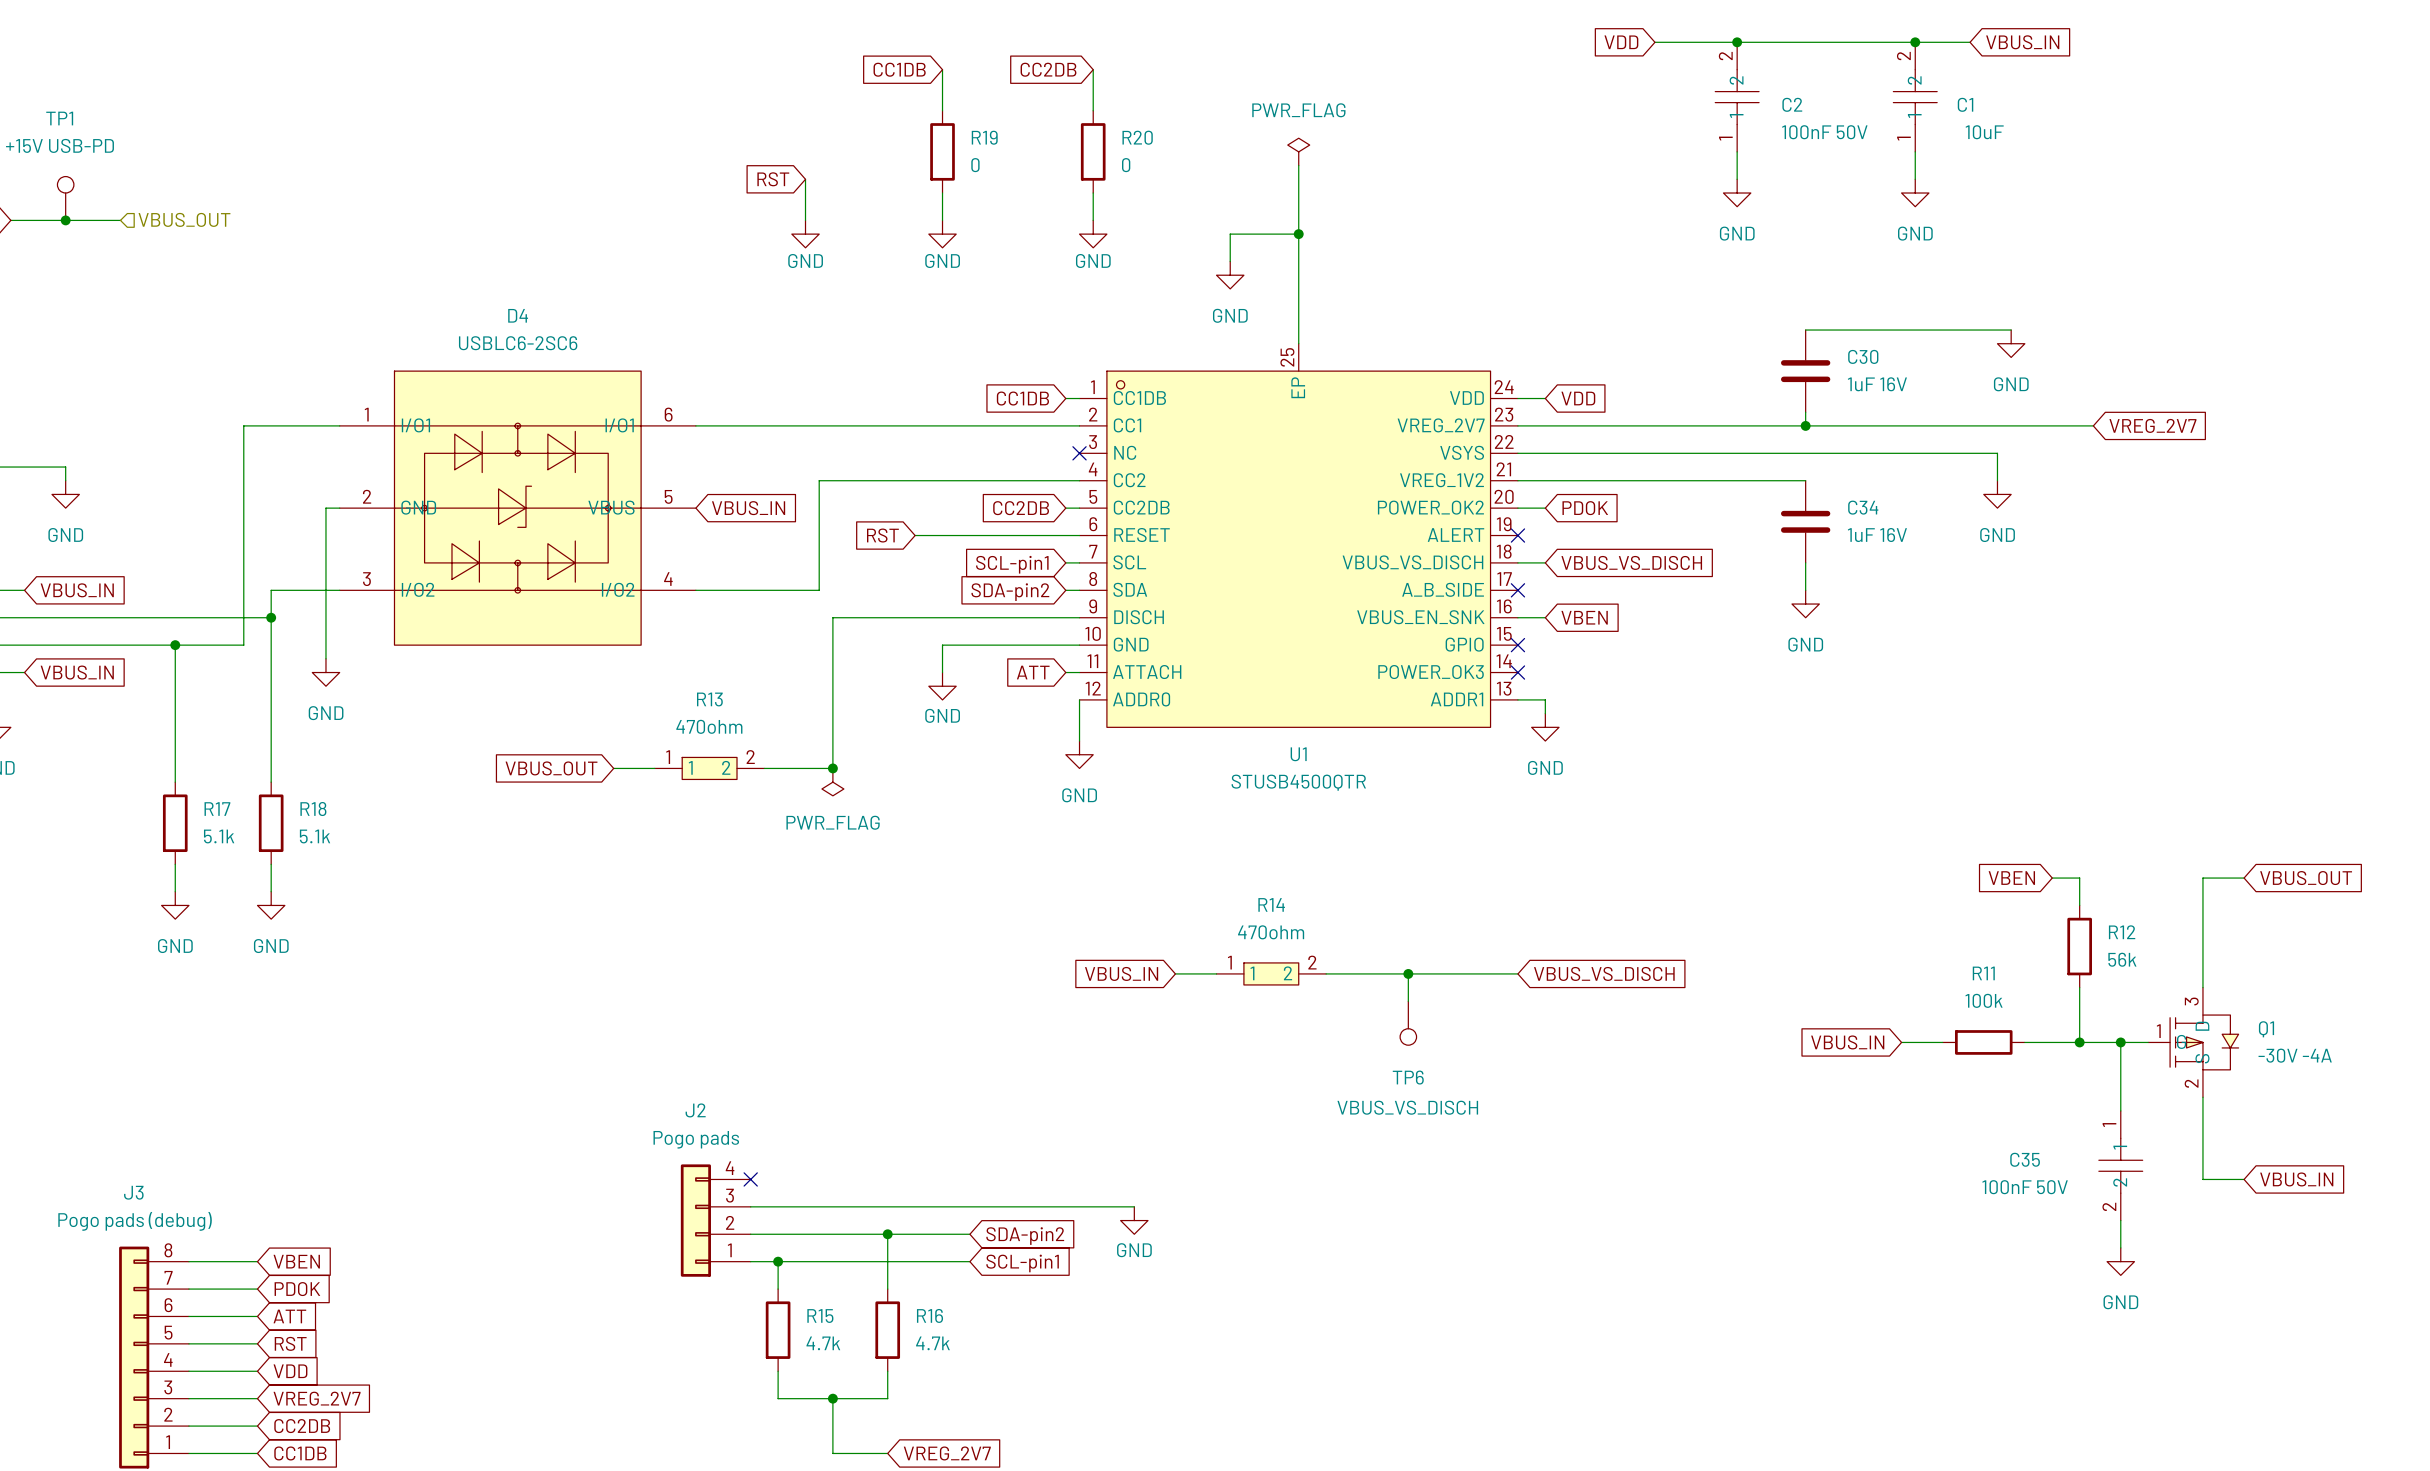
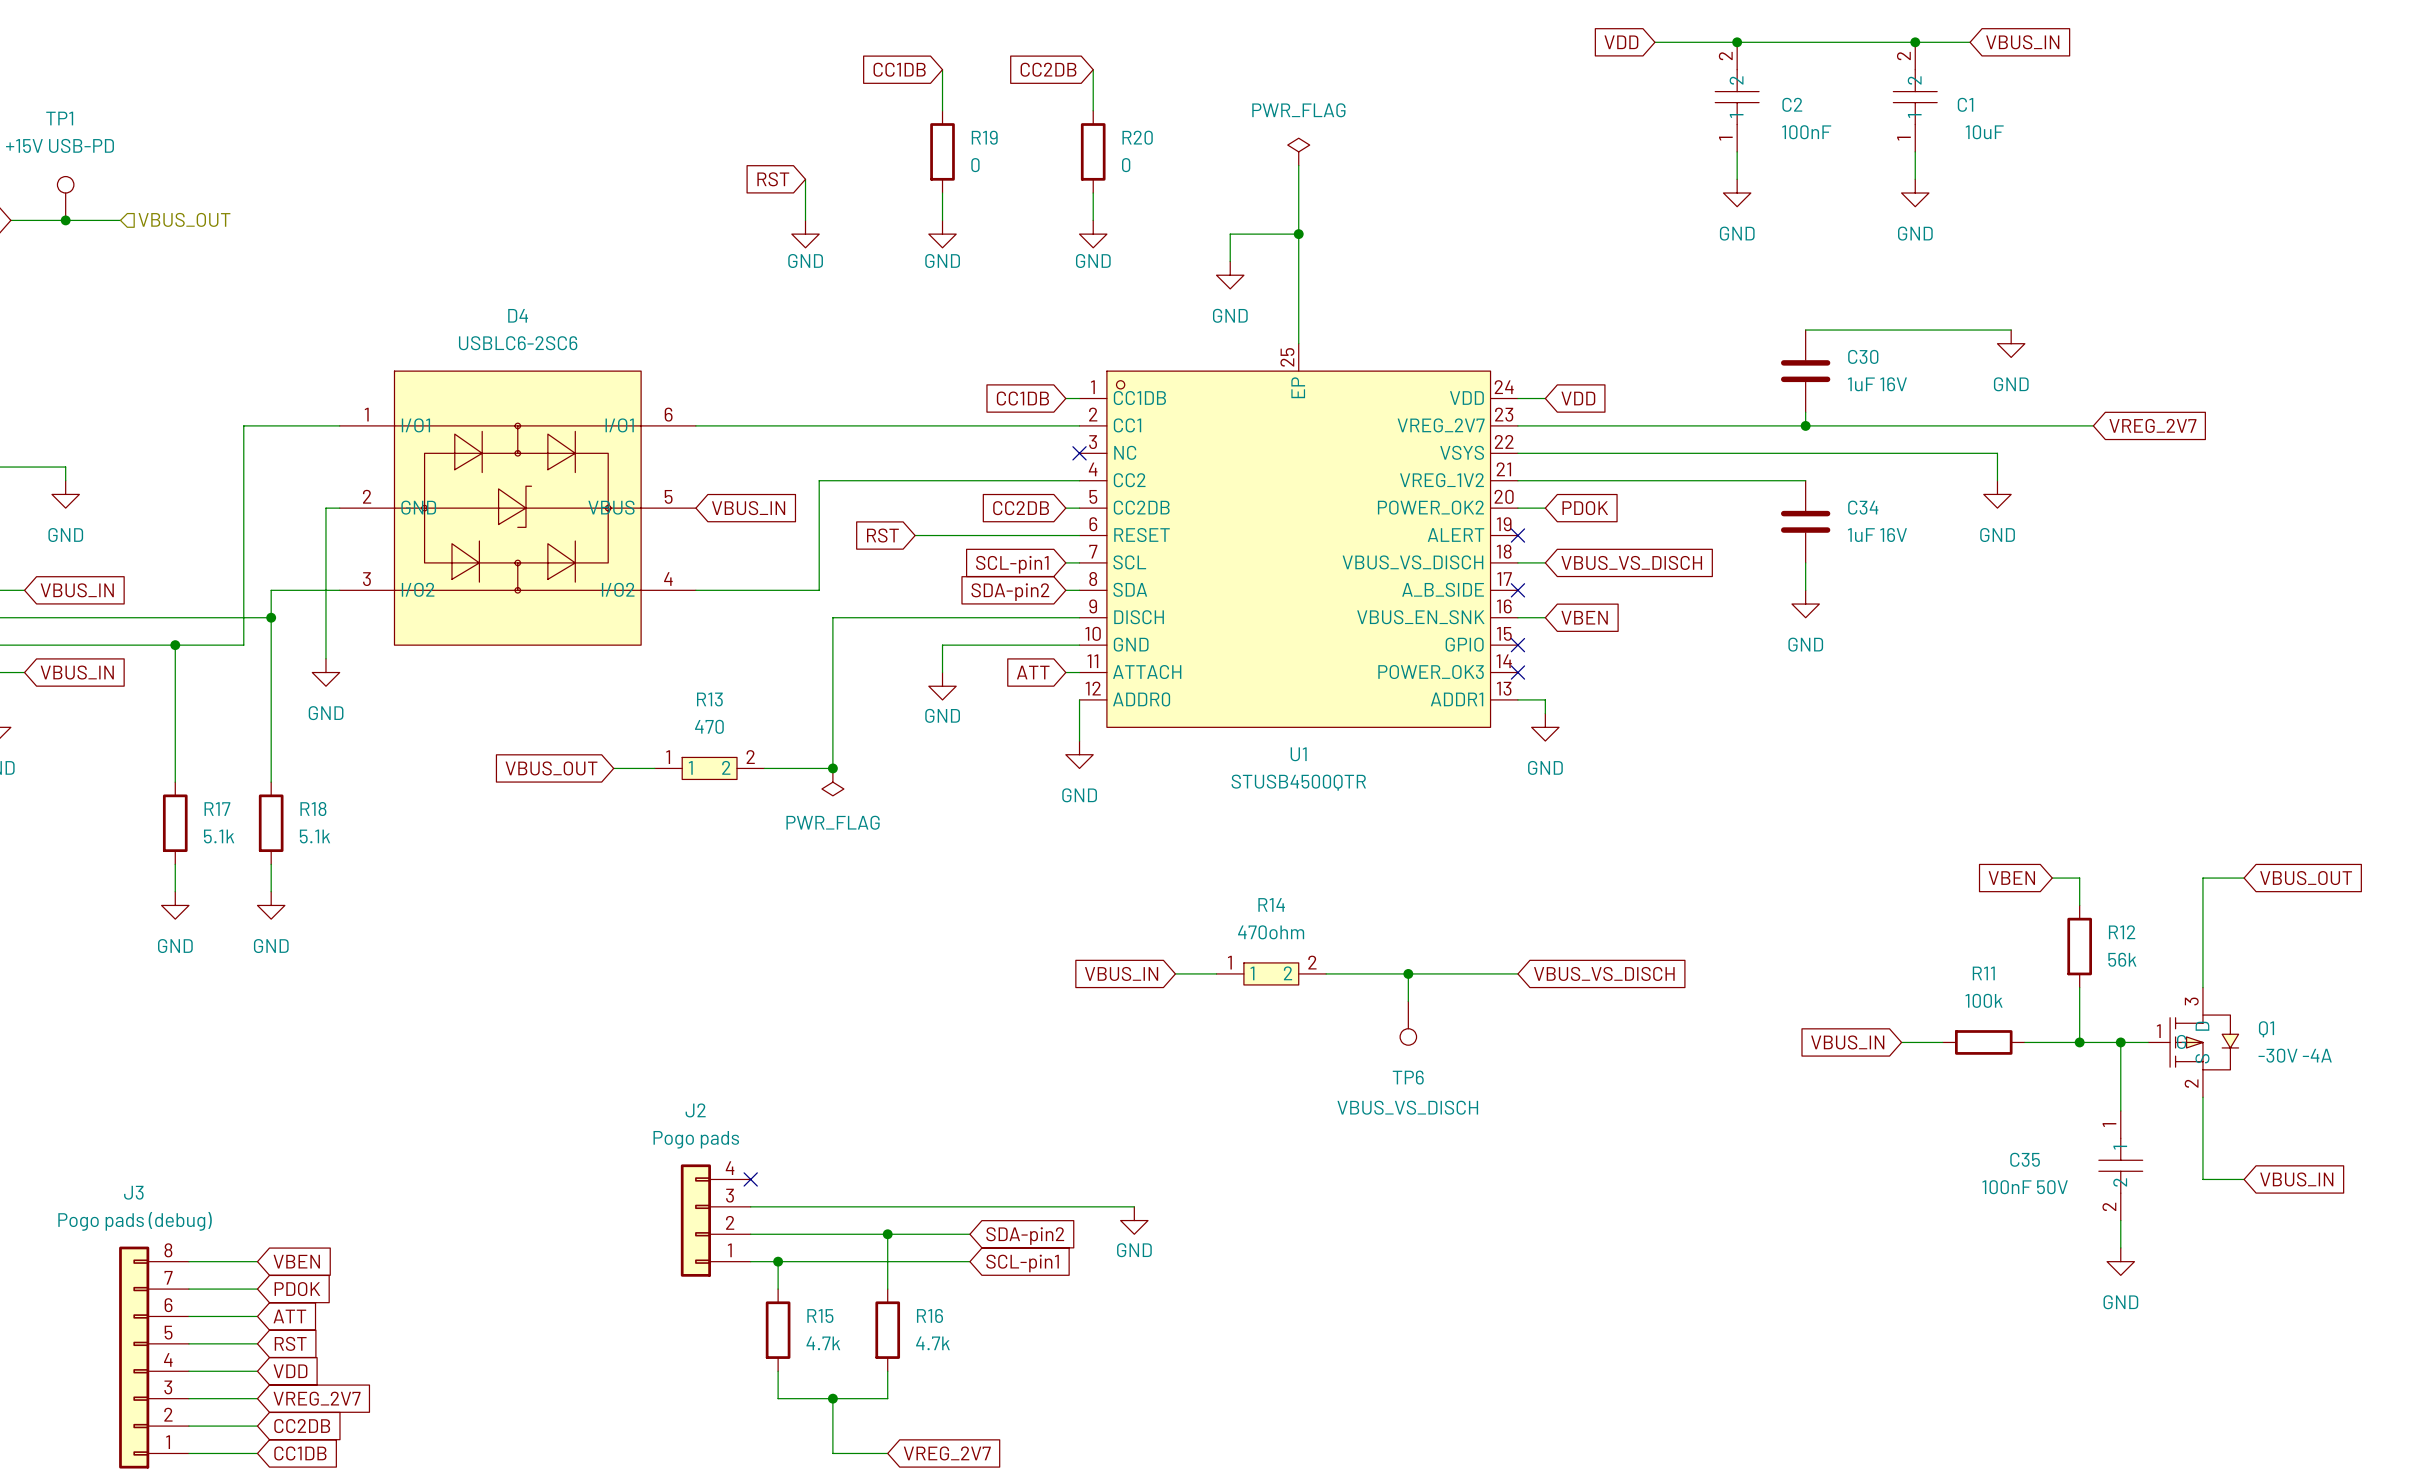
C2 value: 100nF 50V (1824, 132) -> 100nF (1806, 132)
R13 value: 470ohm (709, 726) -> 470 (709, 726)

